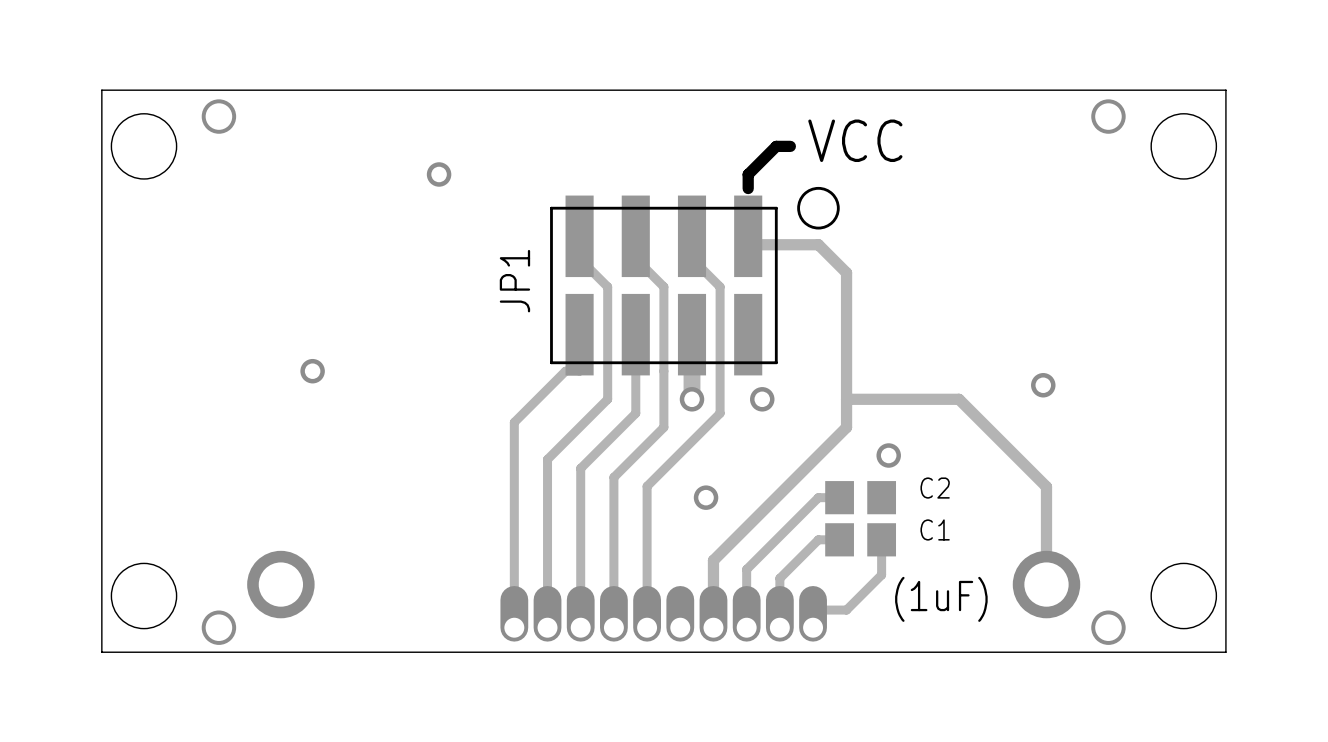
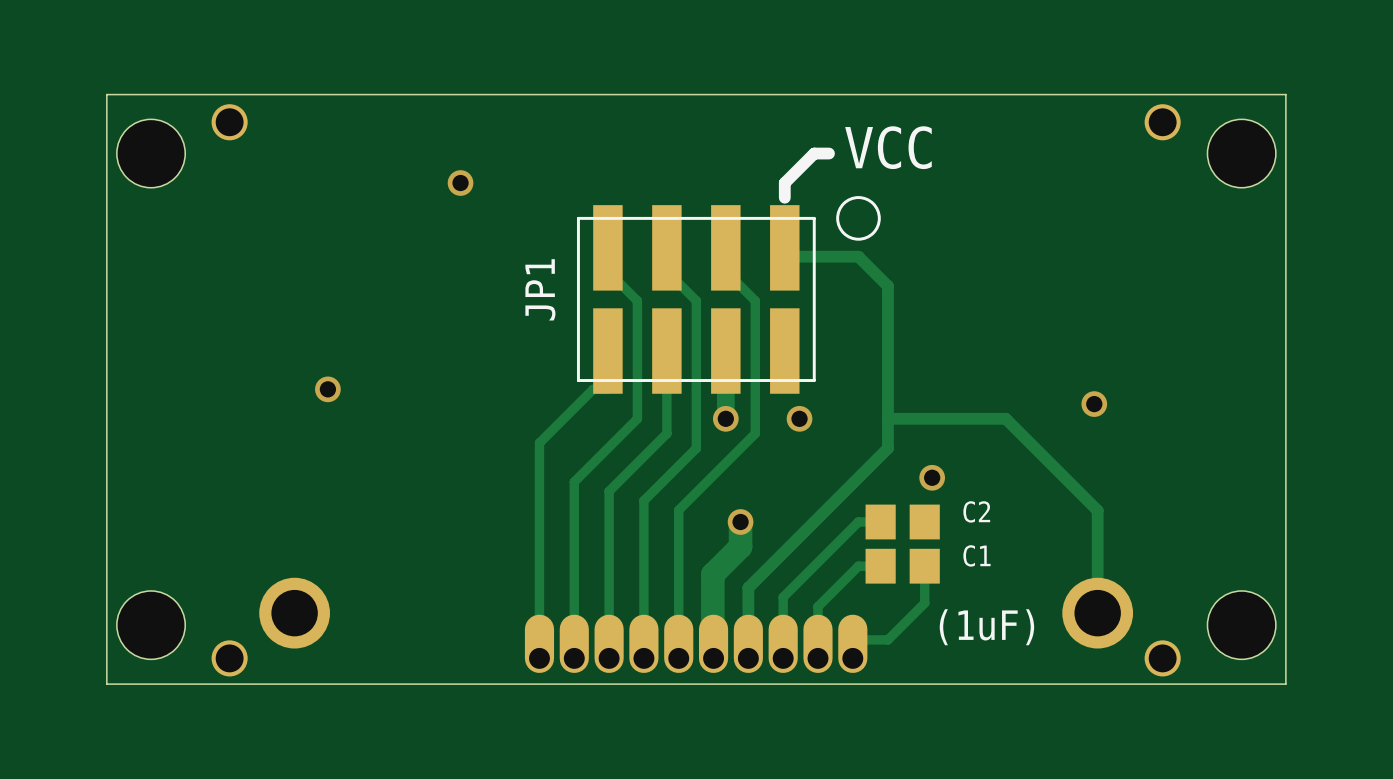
track: none -> (740, 521) (740, 546) (712, 574) (714, 647)

